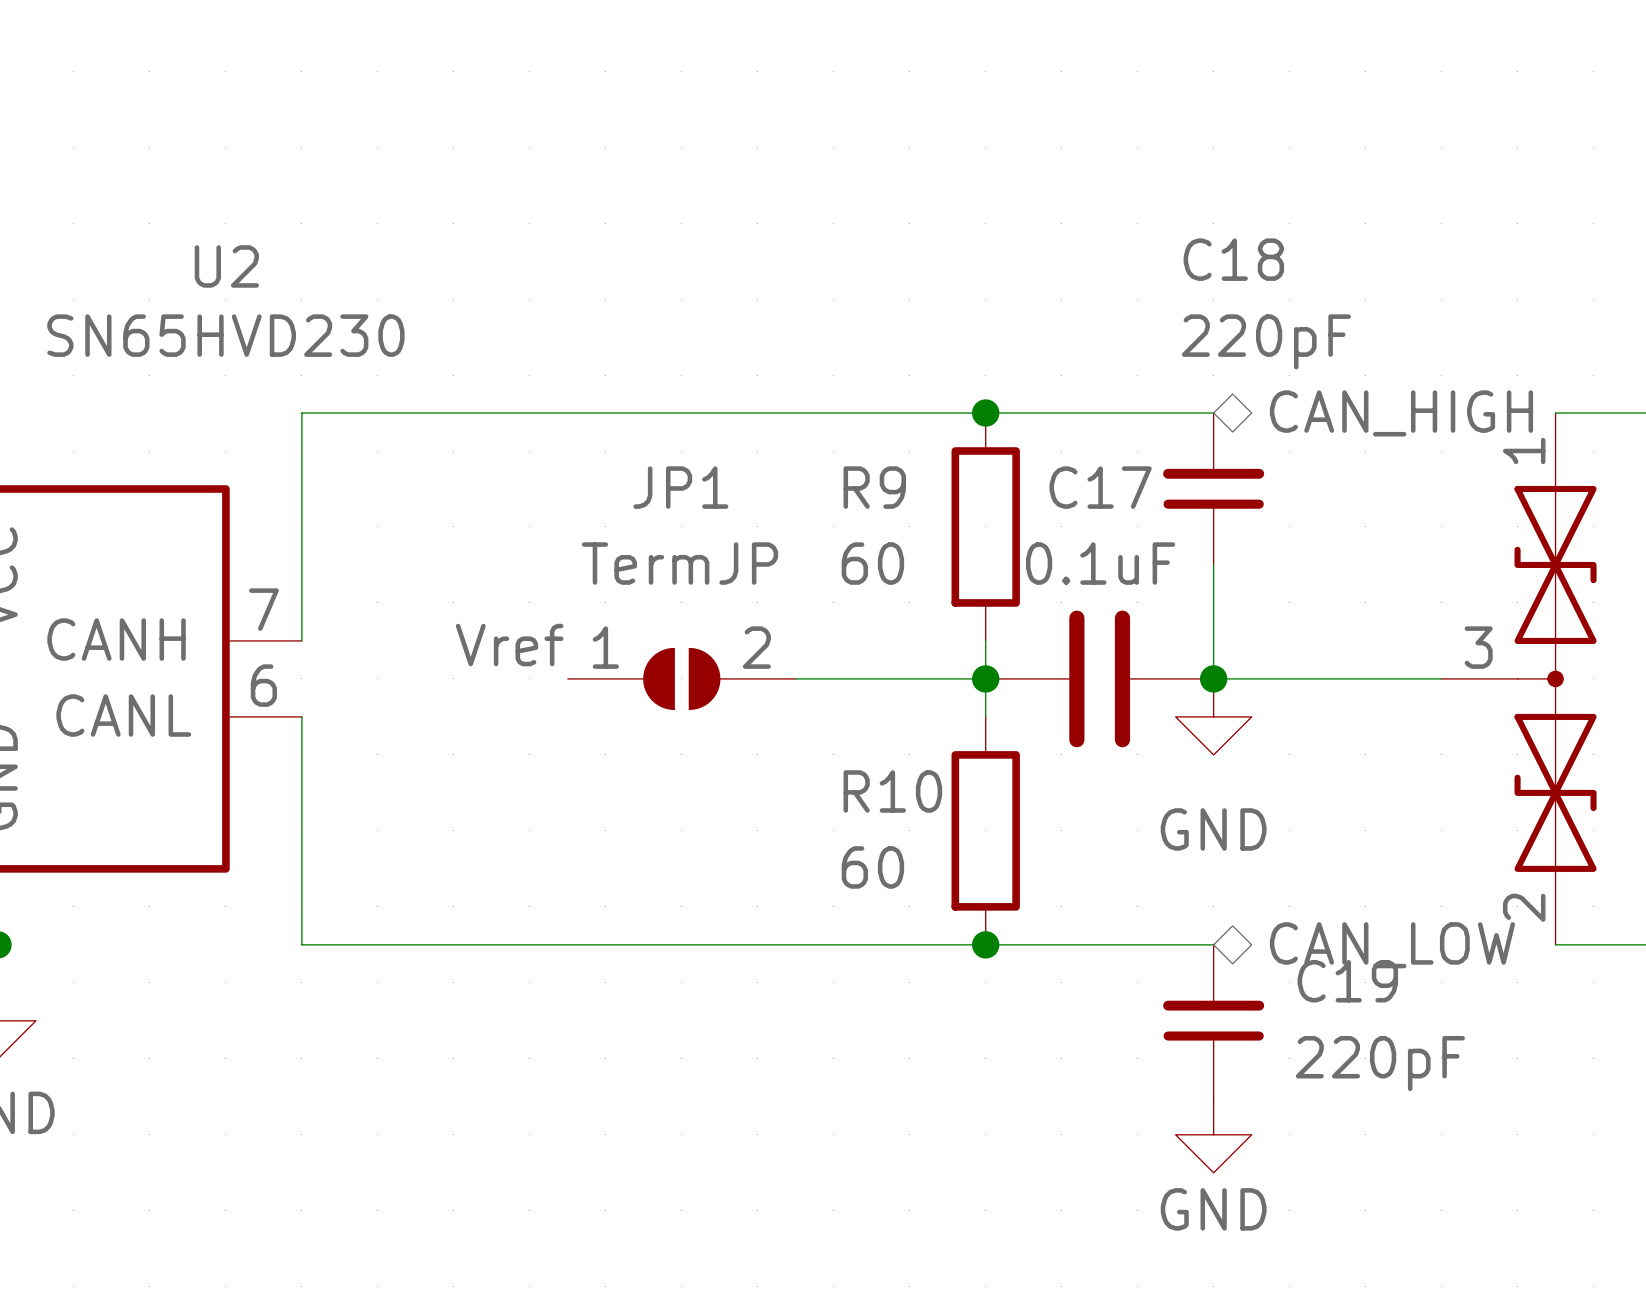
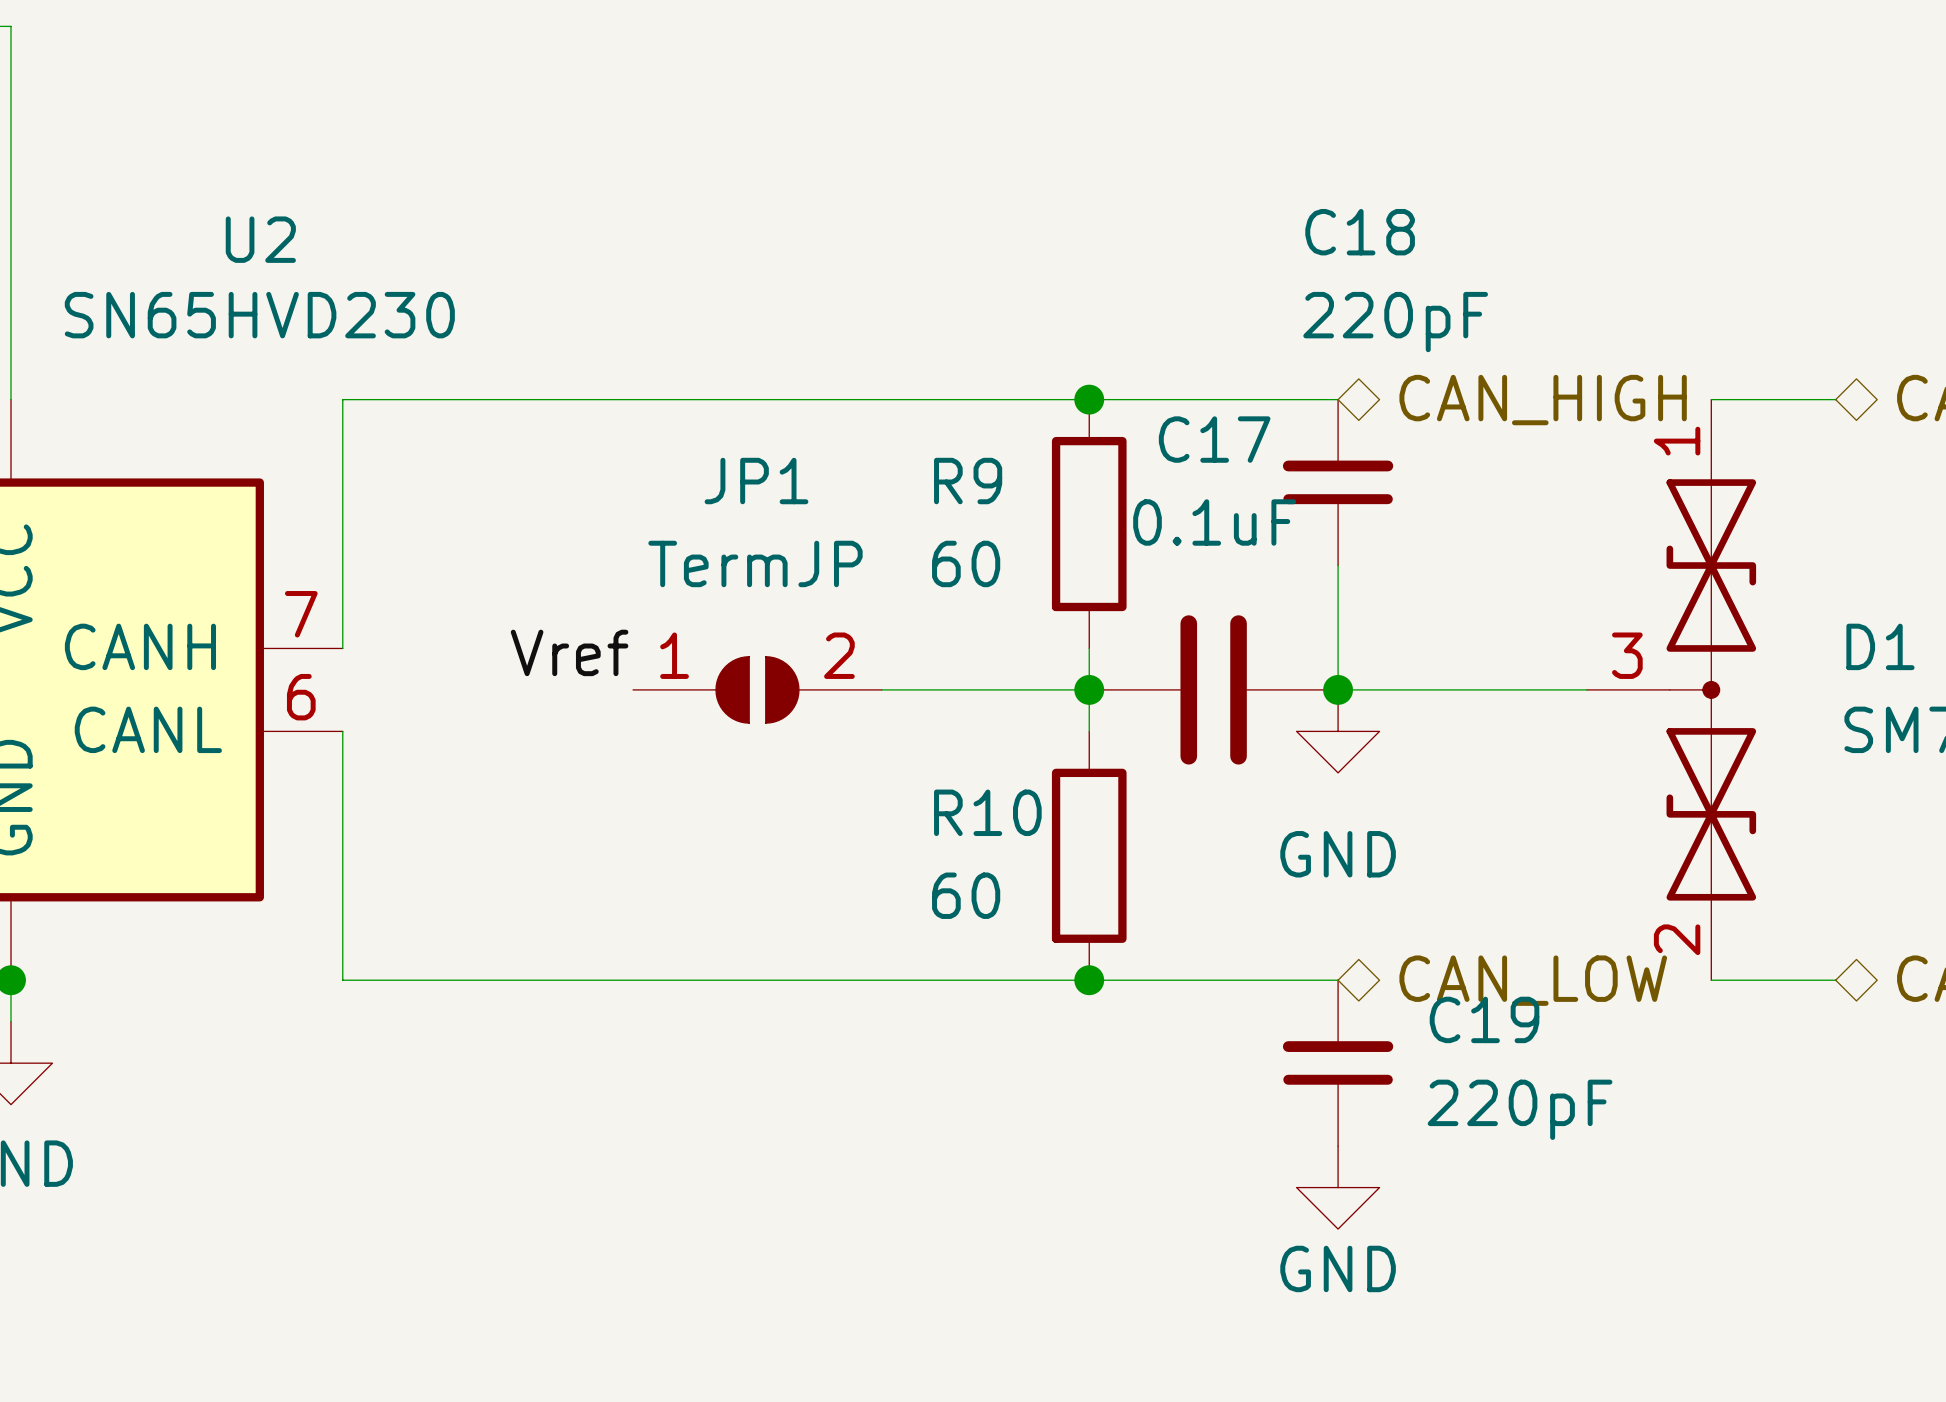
C17 name position: C17 (1100, 487) -> C17 (1214, 439)
C17 value position: 0.1uF (1100, 563) -> 0.1uF (1214, 522)

